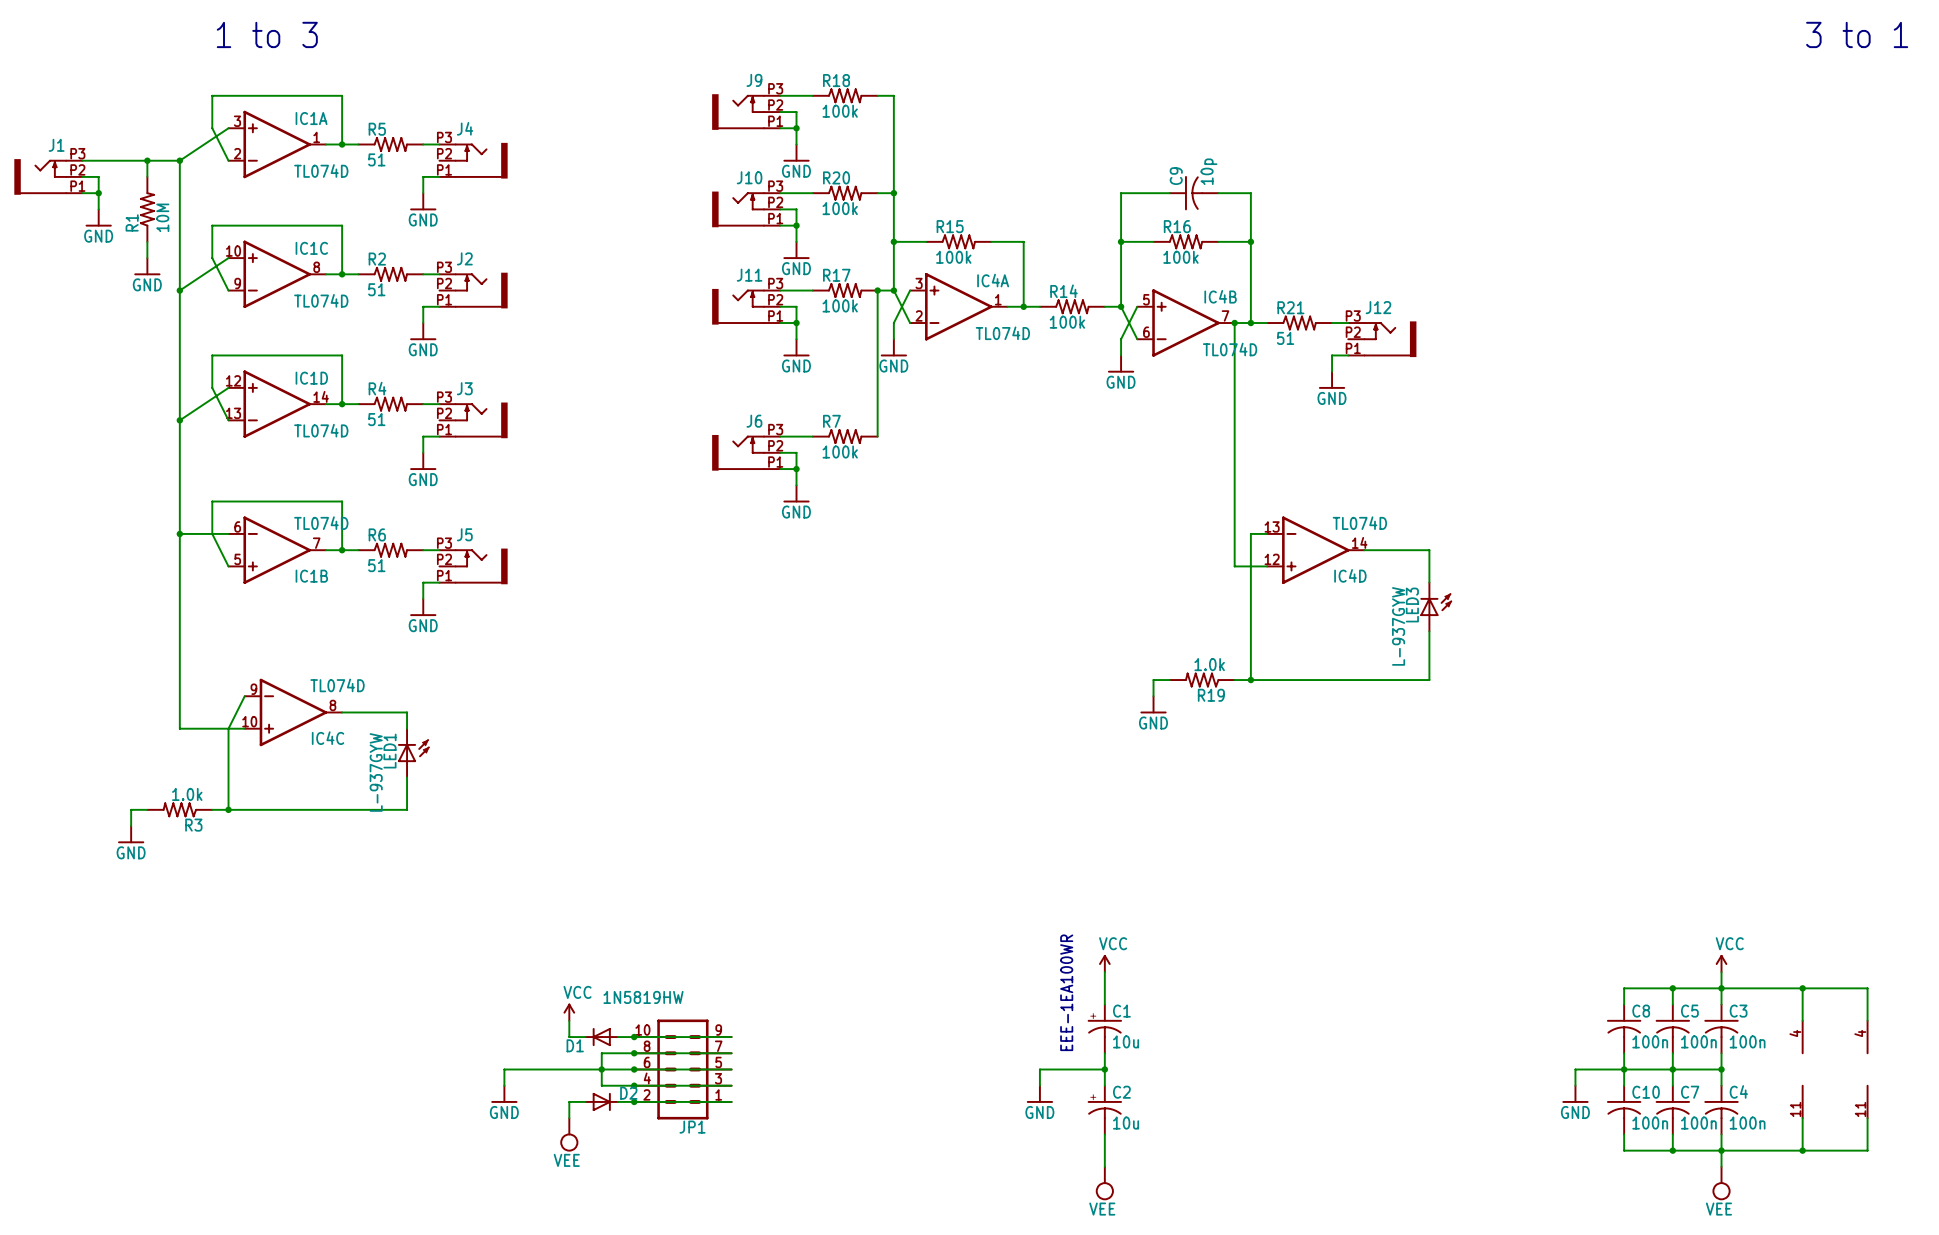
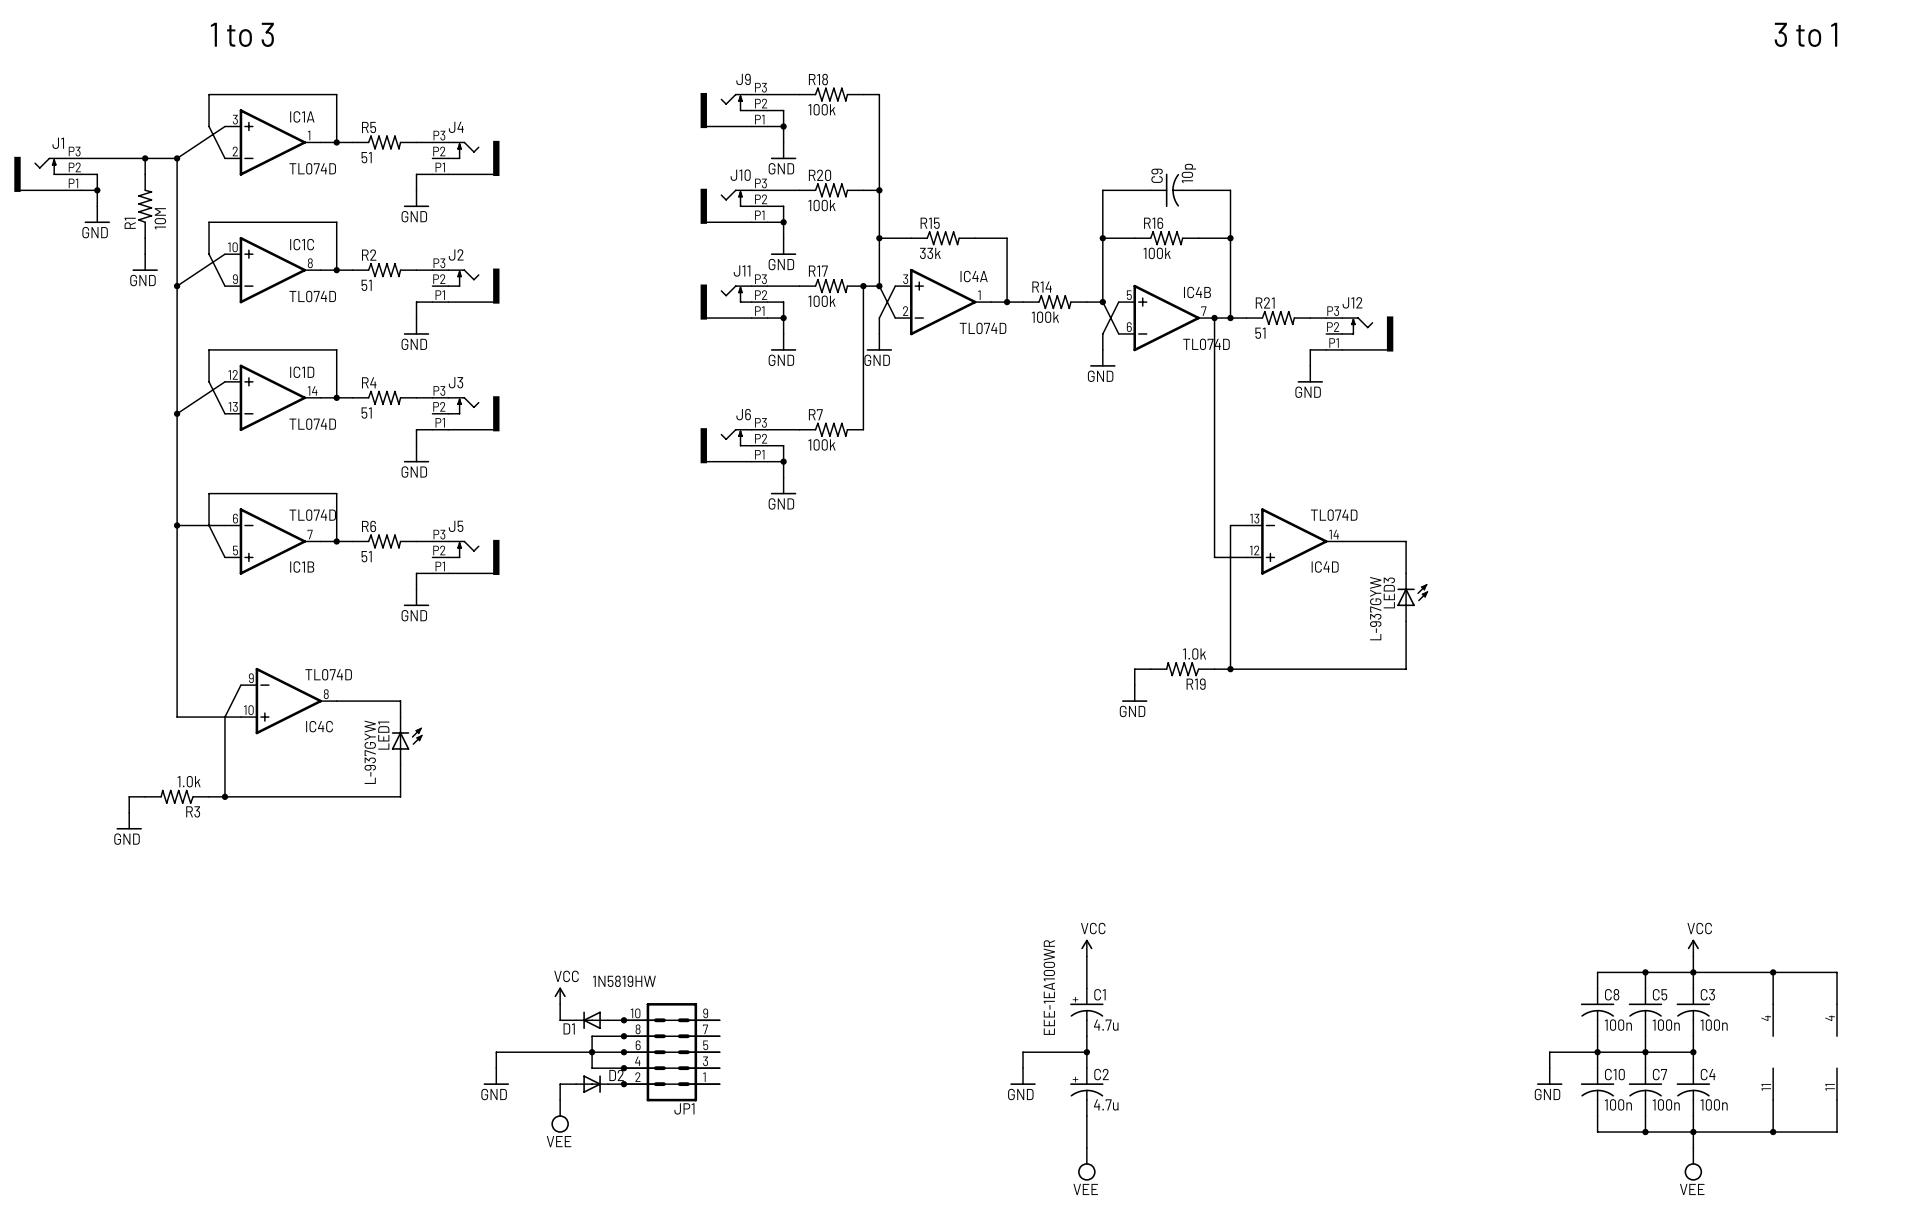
R15 value: 100k (953, 257) -> 33k (930, 253)
C1 value: 10u (1126, 1041) -> 4.7u (1106, 1025)
C2 value: 10u (1126, 1123) -> 4.7u (1106, 1104)

